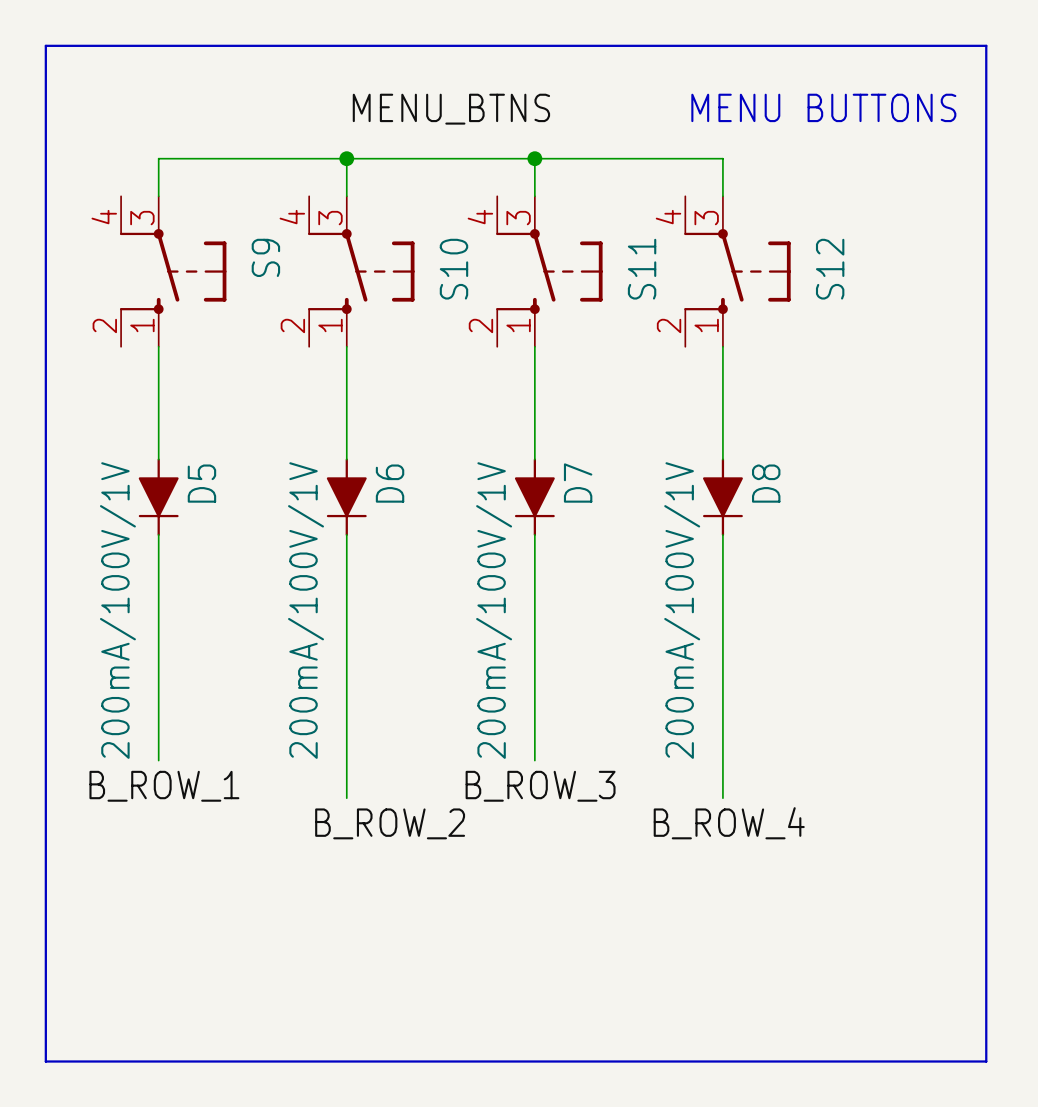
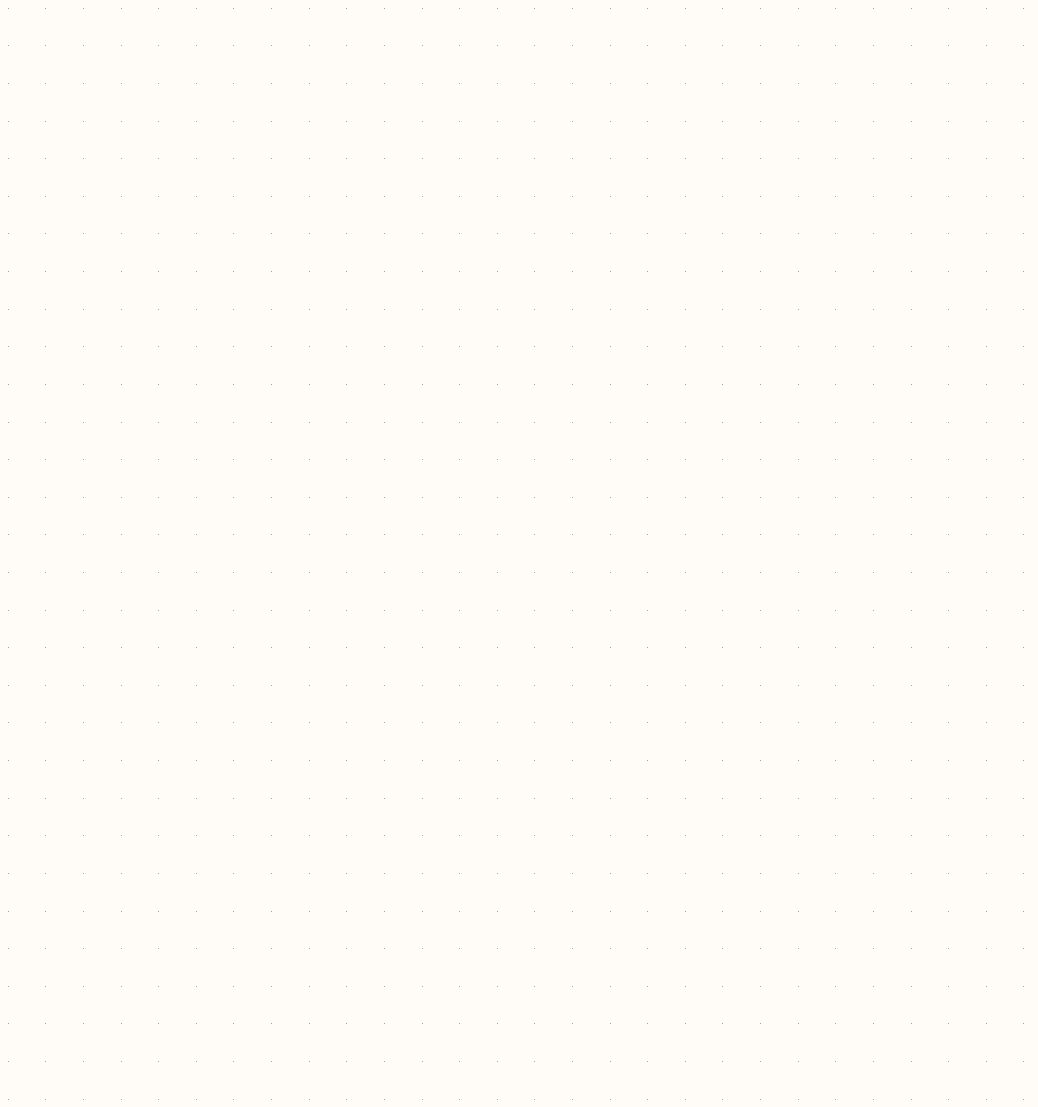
line: (45, 45) (45, 1061) (986, 1061) (986, 45) (45, 45) -> none
text: MENU BUTTONS (823, 107) -> none
label: MENU_BTNS (451, 109) -> none
wire: (346, 158) (346, 196) -> none
junction: (346, 158) -> none
wire: (534, 158) (534, 196) -> none
junction: (534, 158) -> none
wire: (158, 196) (158, 158) (722, 158) (722, 196) -> none
S9: (173, 271) -> none
S10: (361, 271) -> none
S11: (549, 271) -> none
S12: (737, 271) -> none
wire: (158, 346) (158, 459) -> none
wire: (346, 346) (346, 459) -> none
wire: (534, 346) (534, 459) -> none
wire: (722, 346) (722, 459) -> none
D5: 200mA/100V/1V (158, 497) -> none
D6: 200mA/100V/1V (346, 497) -> none
D7: 200mA/100V/1V (534, 497) -> none
D8: 200mA/100V/1V (722, 497) -> none
wire: (158, 534) (158, 760) -> none
wire: (346, 534) (346, 798) -> none
wire: (534, 534) (534, 760) -> none
wire: (722, 534) (722, 798) -> none
label: B_ROW_1 (164, 786) -> none
label: B_ROW_3 (540, 786) -> none
label: B_ROW_2 (390, 823) -> none
label: B_ROW_4 (729, 823) -> none

